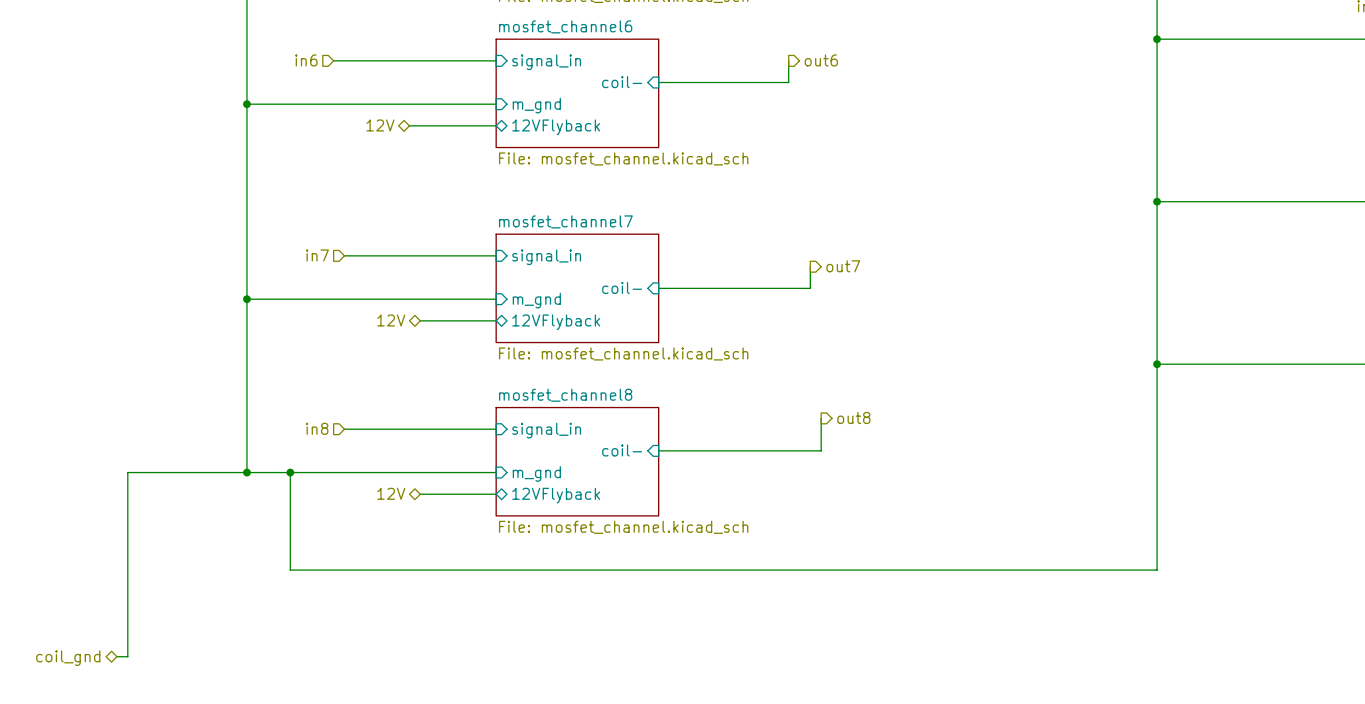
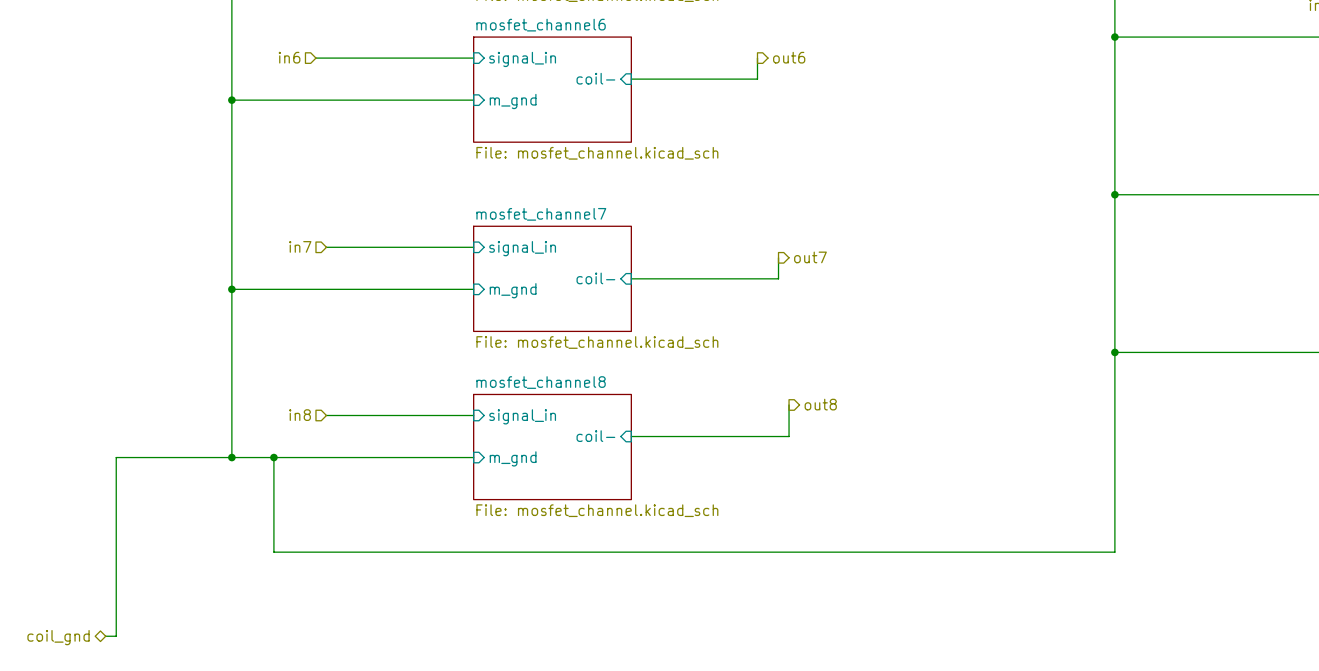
hierarchical label: 12V (380, 125) -> none
wire: (409, 125) (496, 125) -> none
sheet pin: 12VFlyback (556, 127) -> none
hierarchical label: 12V (391, 320) -> none
wire: (420, 320) (496, 320) -> none
sheet pin: 12VFlyback (556, 322) -> none
hierarchical label: 12V (391, 493) -> none
wire: (420, 494) (496, 494) -> none
sheet pin: 12VFlyback (556, 495) -> none

